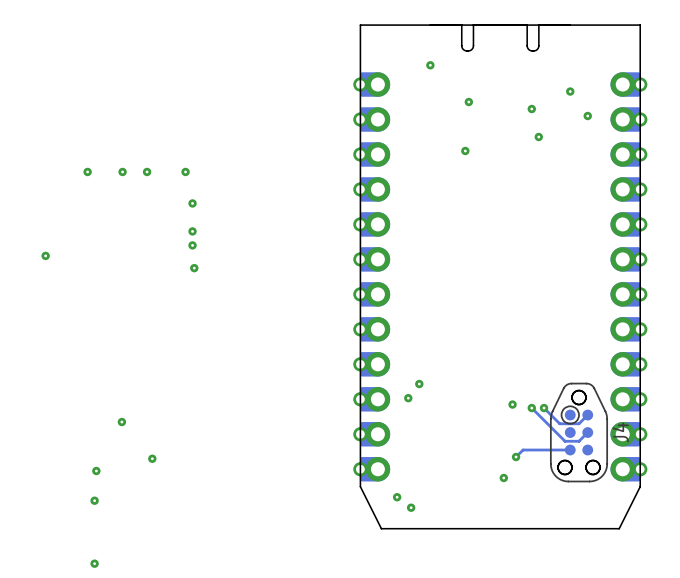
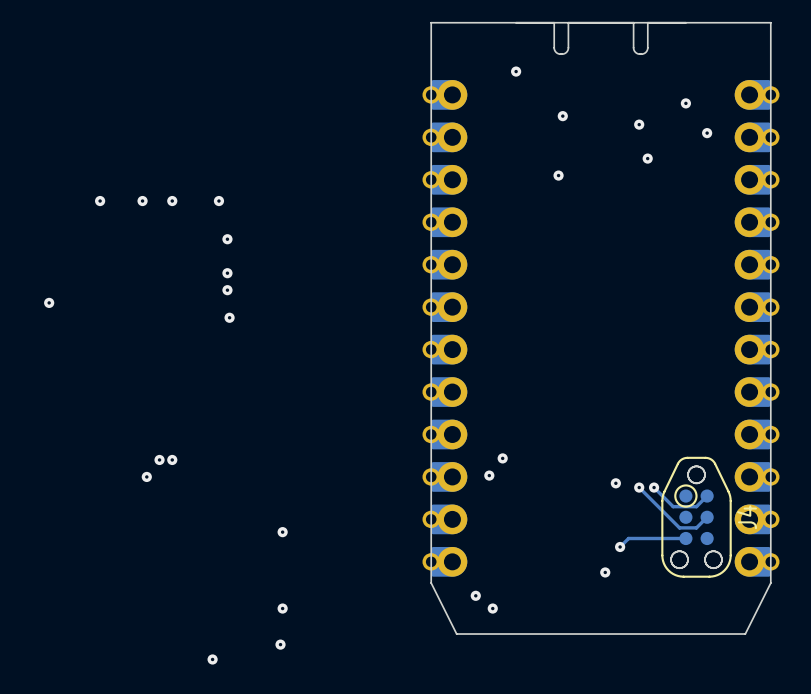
via: none -> (159, 459)
via: none -> (172, 459)
via: none -> (146, 476)
via: (121, 422) -> none
via: none -> (282, 532)
via: (152, 458) -> none
via: (96, 470) -> none
via: (94, 500) -> none
via: none -> (282, 608)
via: none -> (280, 644)
via: none -> (212, 659)
via: (94, 563) -> none

